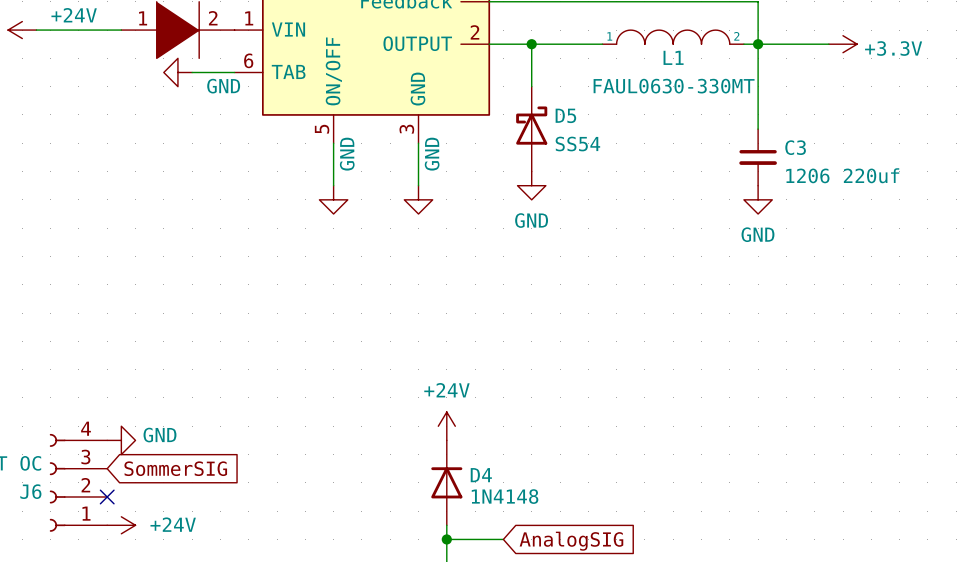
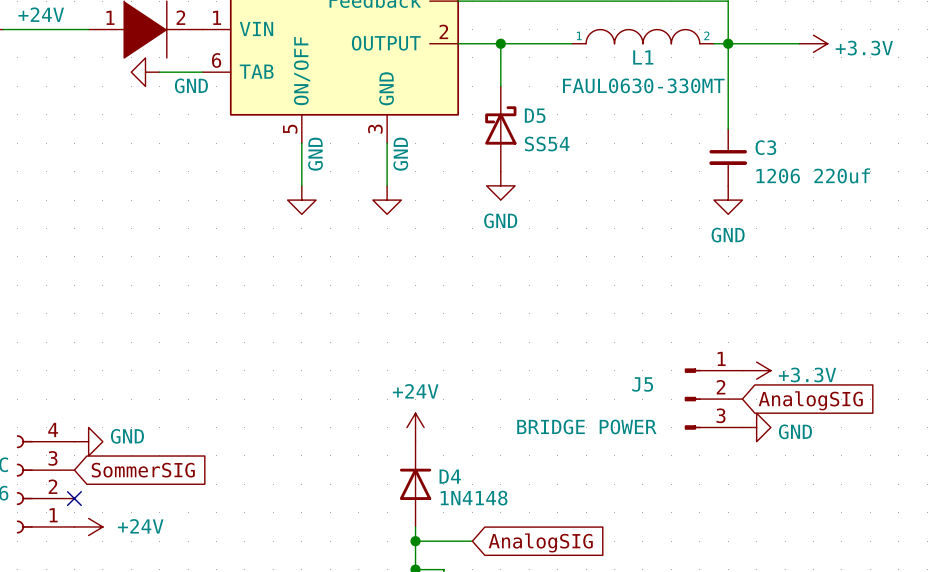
power symbol: none -> +3.3V (756, 370)
J5: none -> BRIDGE POWER (713, 399)
global label: none -> AnalogSIG (810, 400)
power symbol: none -> GND (756, 427)

